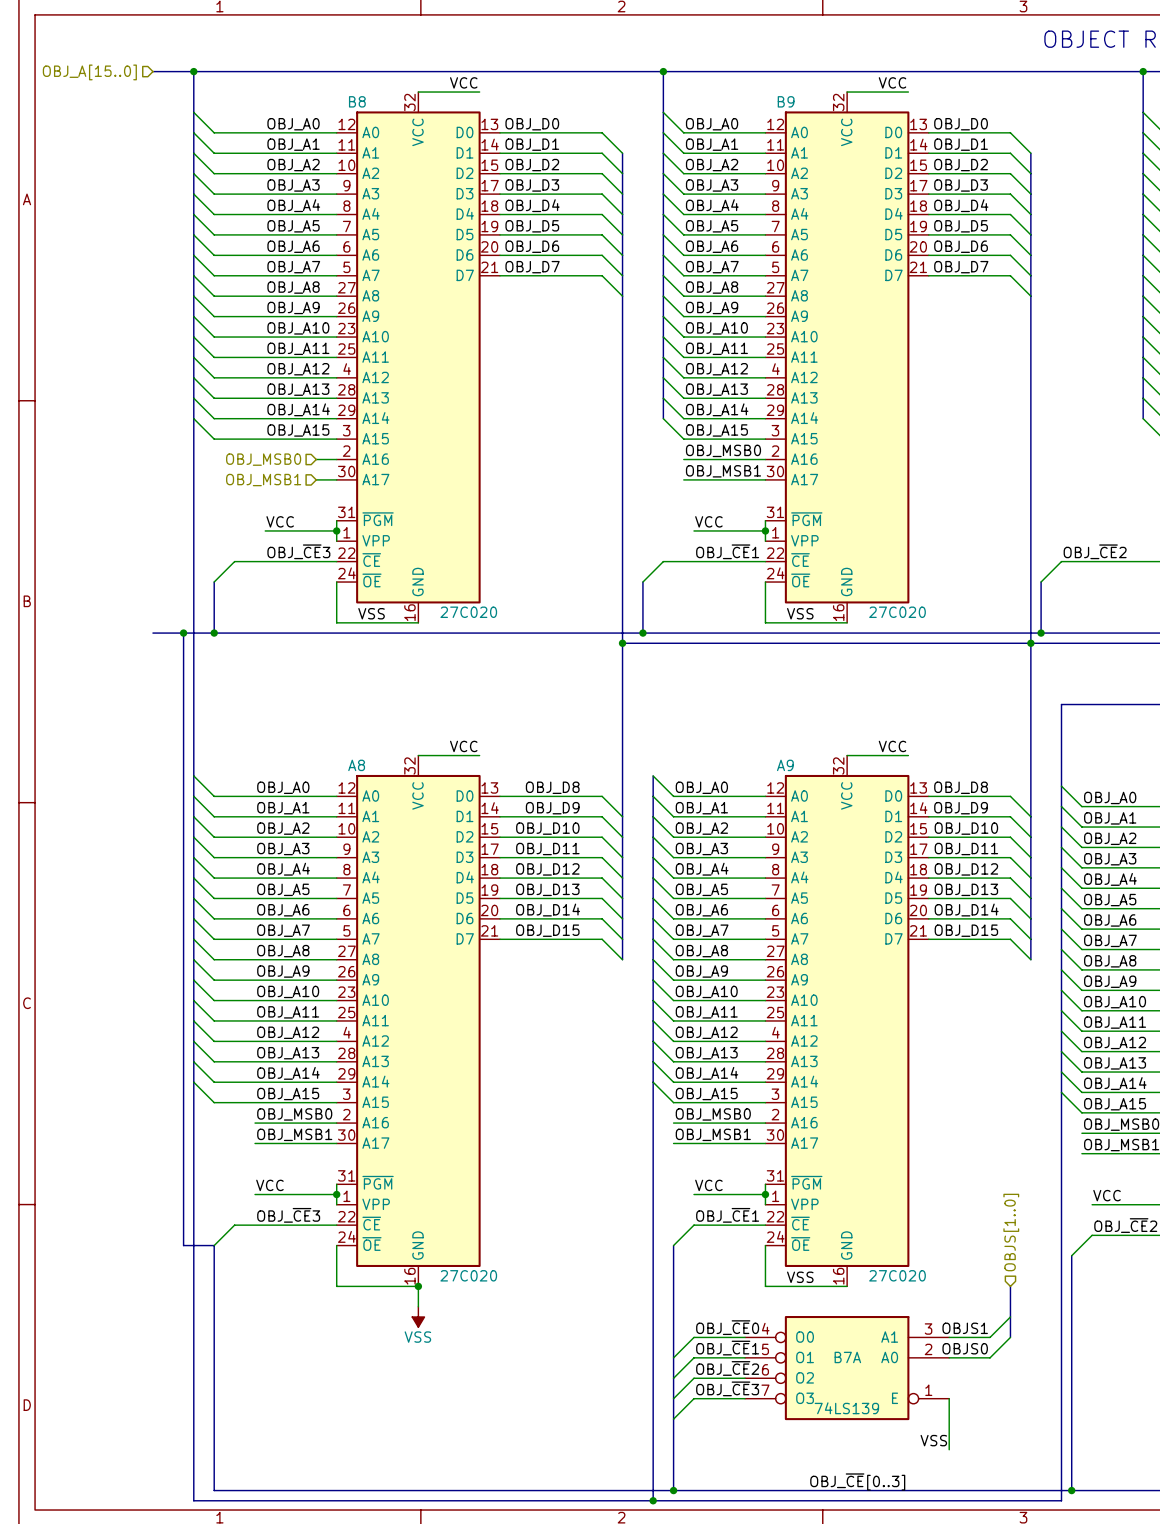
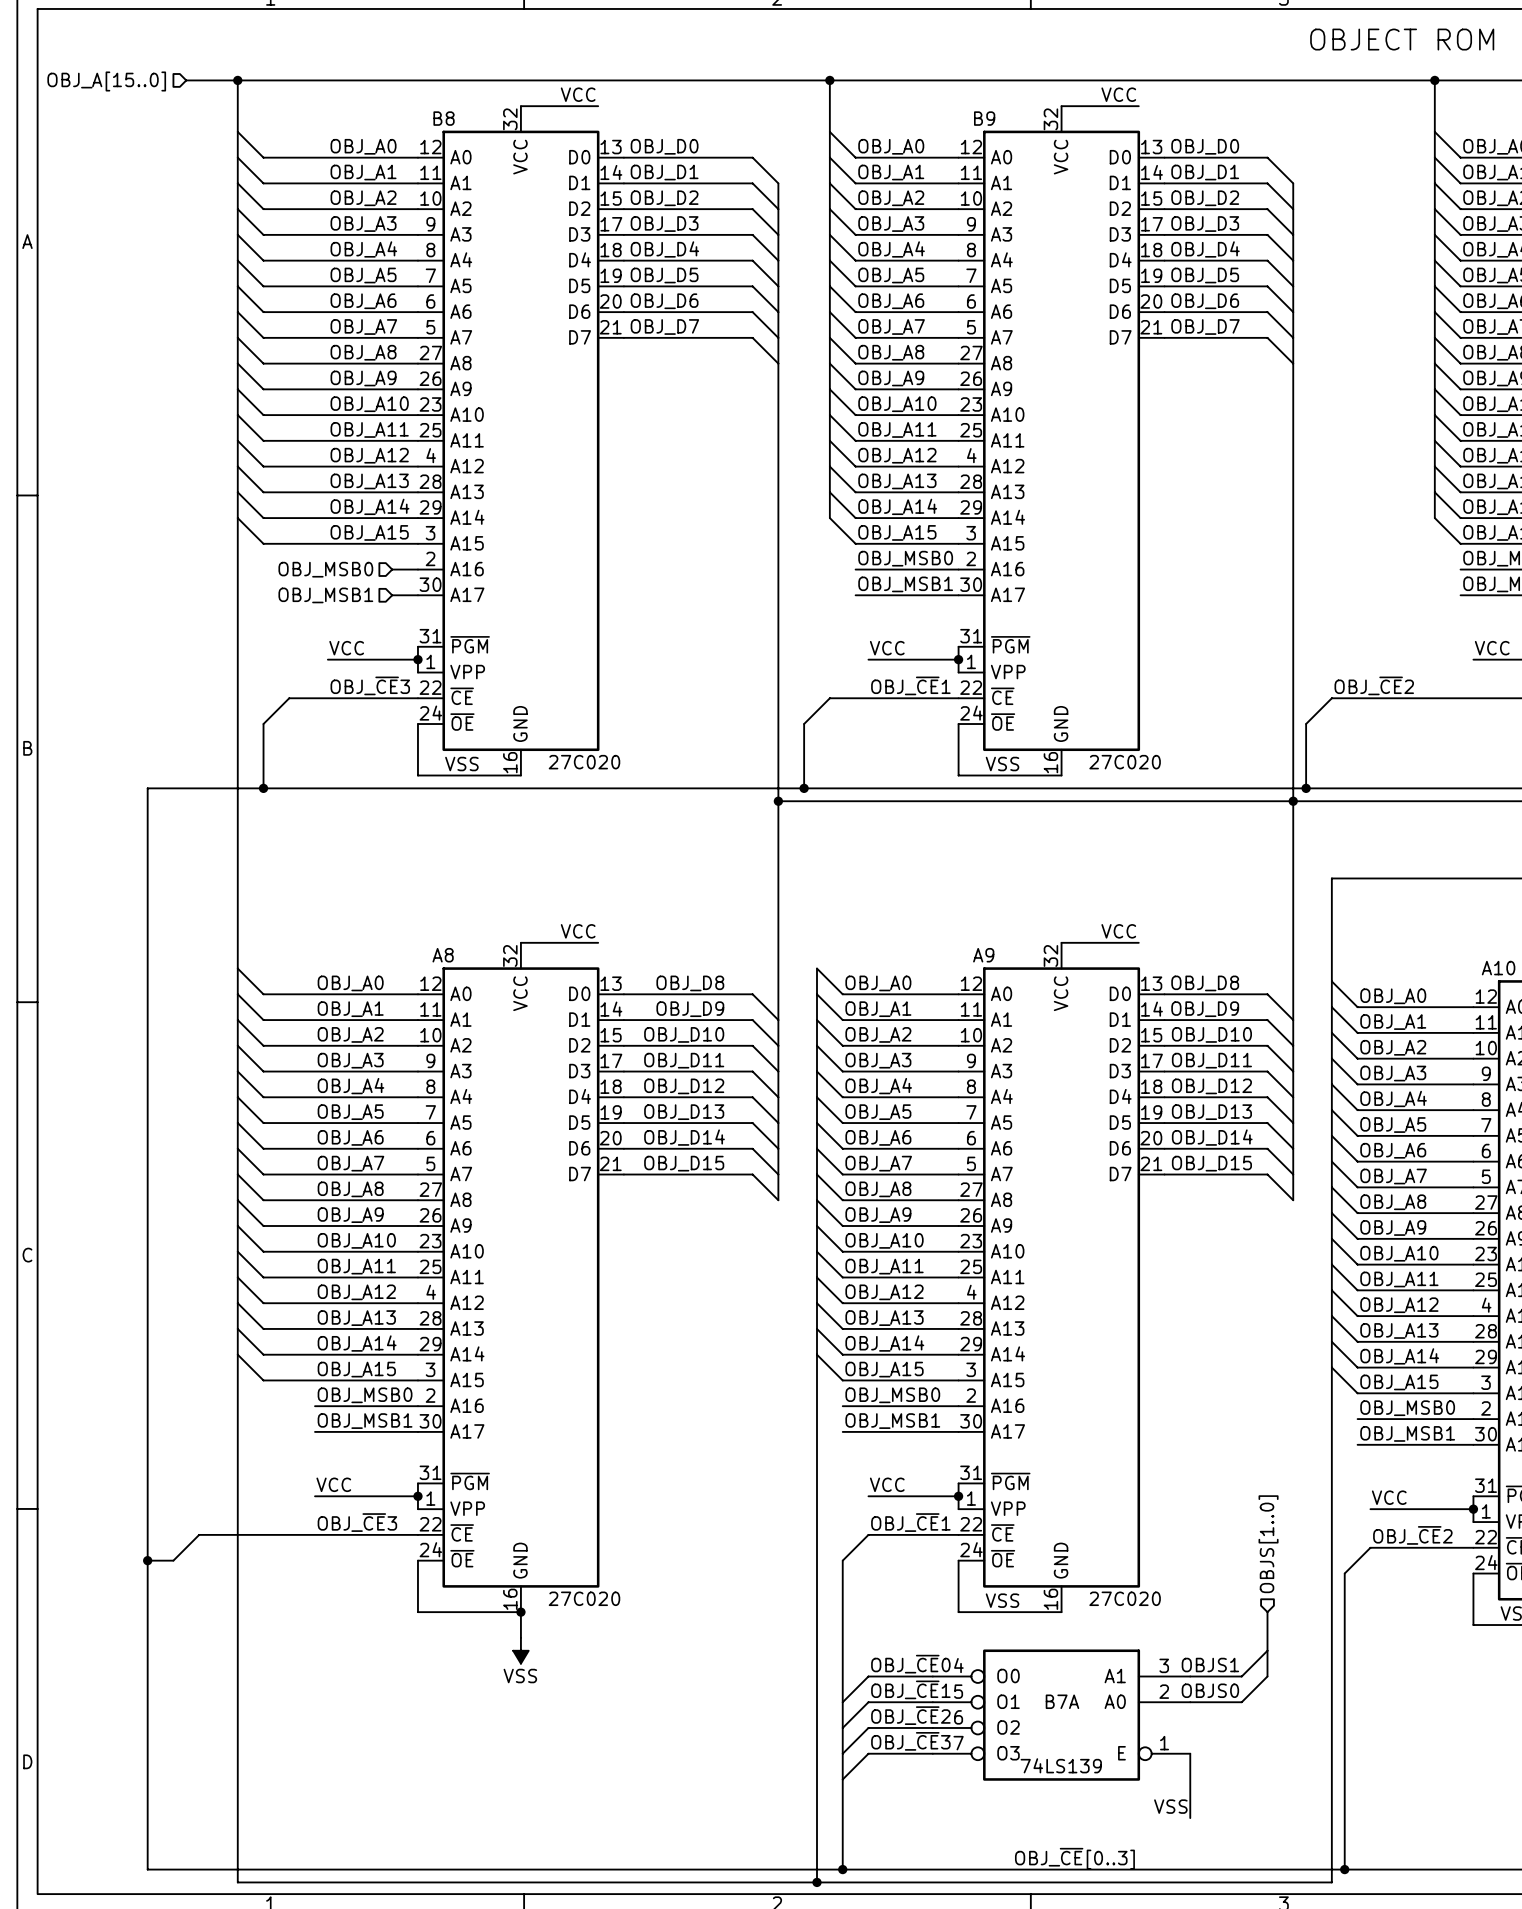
bus: (183, 633) (183, 1245) (214, 1245) (214, 1490) -> (186, 788) (147, 788) (147, 1869) (263, 1869)
junction: (183, 633) -> none
wire: (234, 1225) (214, 1245) -> (289, 1534) (199, 1534) (173, 1560)
bus: none -> (147, 1560) (173, 1560)
junction: none -> (147, 1560)

